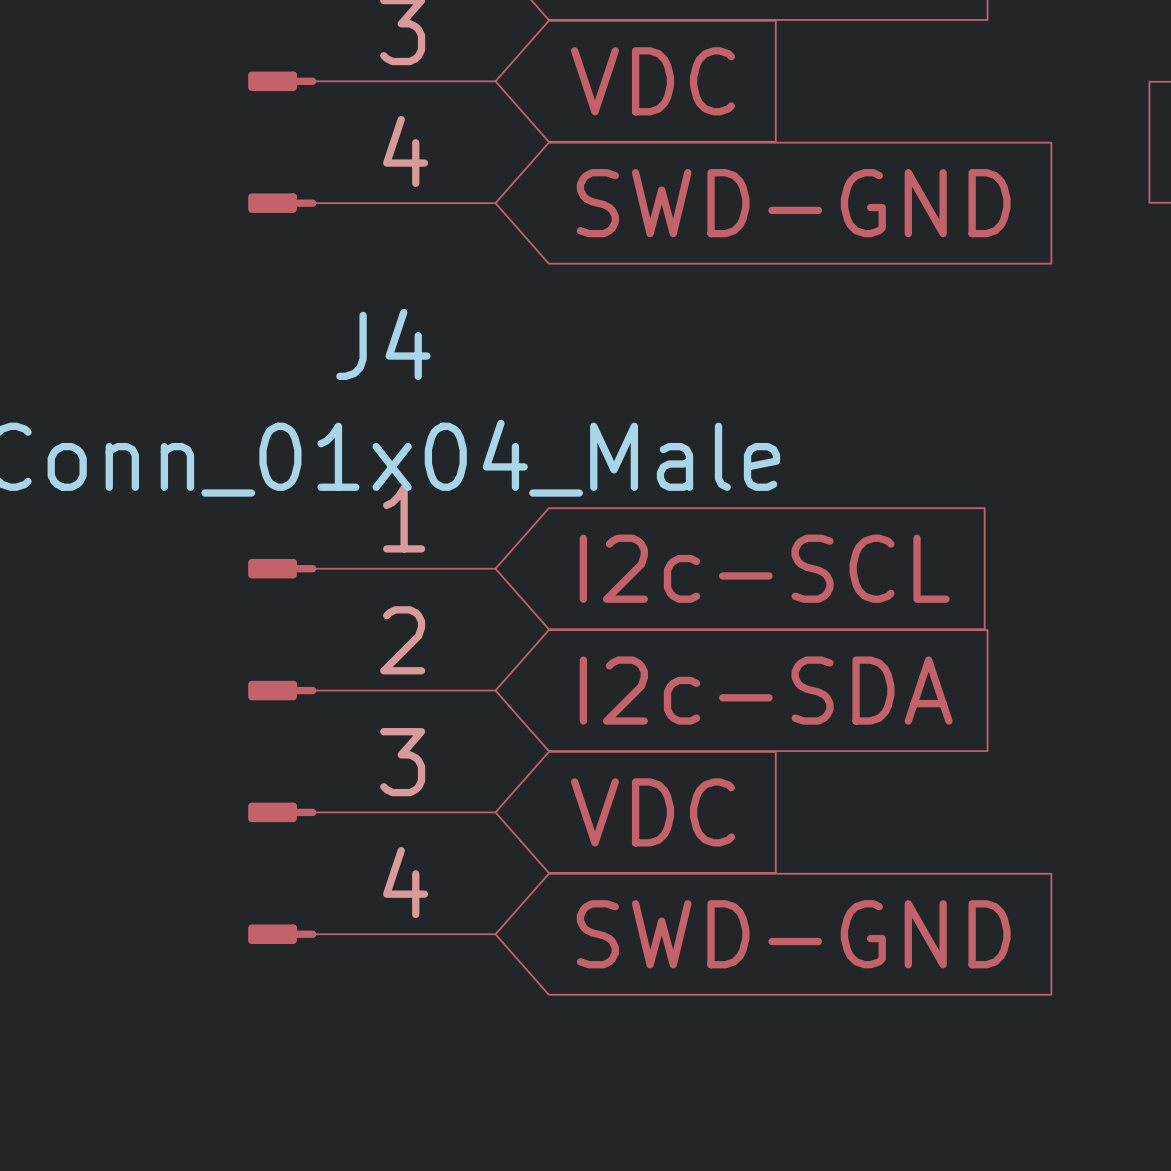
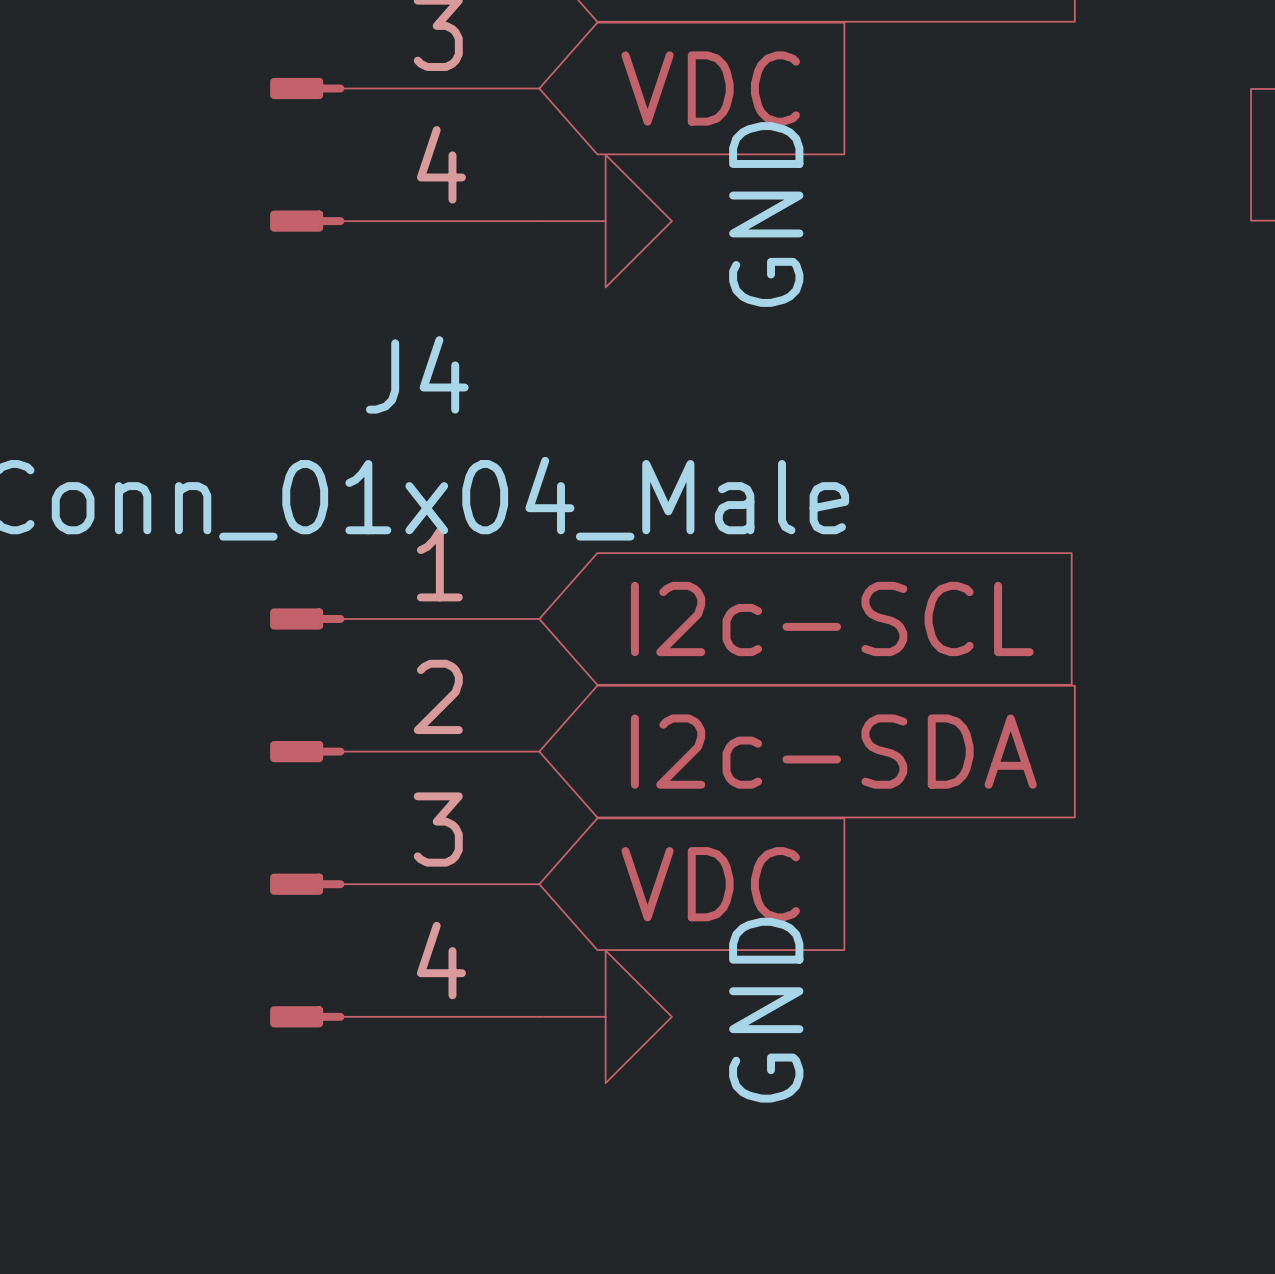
power symbol: none -> GND (605, 221)
global label: SWD-GND (793, 203) -> none
power symbol: none -> GND (605, 1016)
global label: SWD-GND (793, 934) -> none

